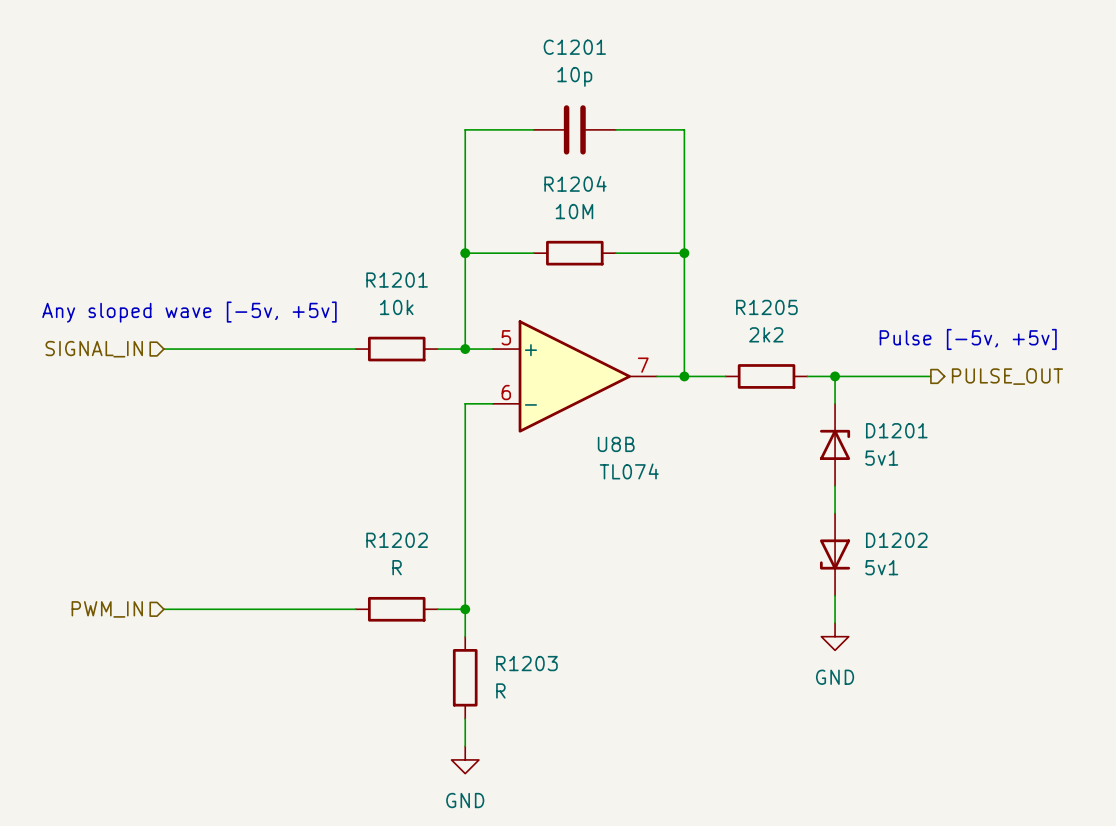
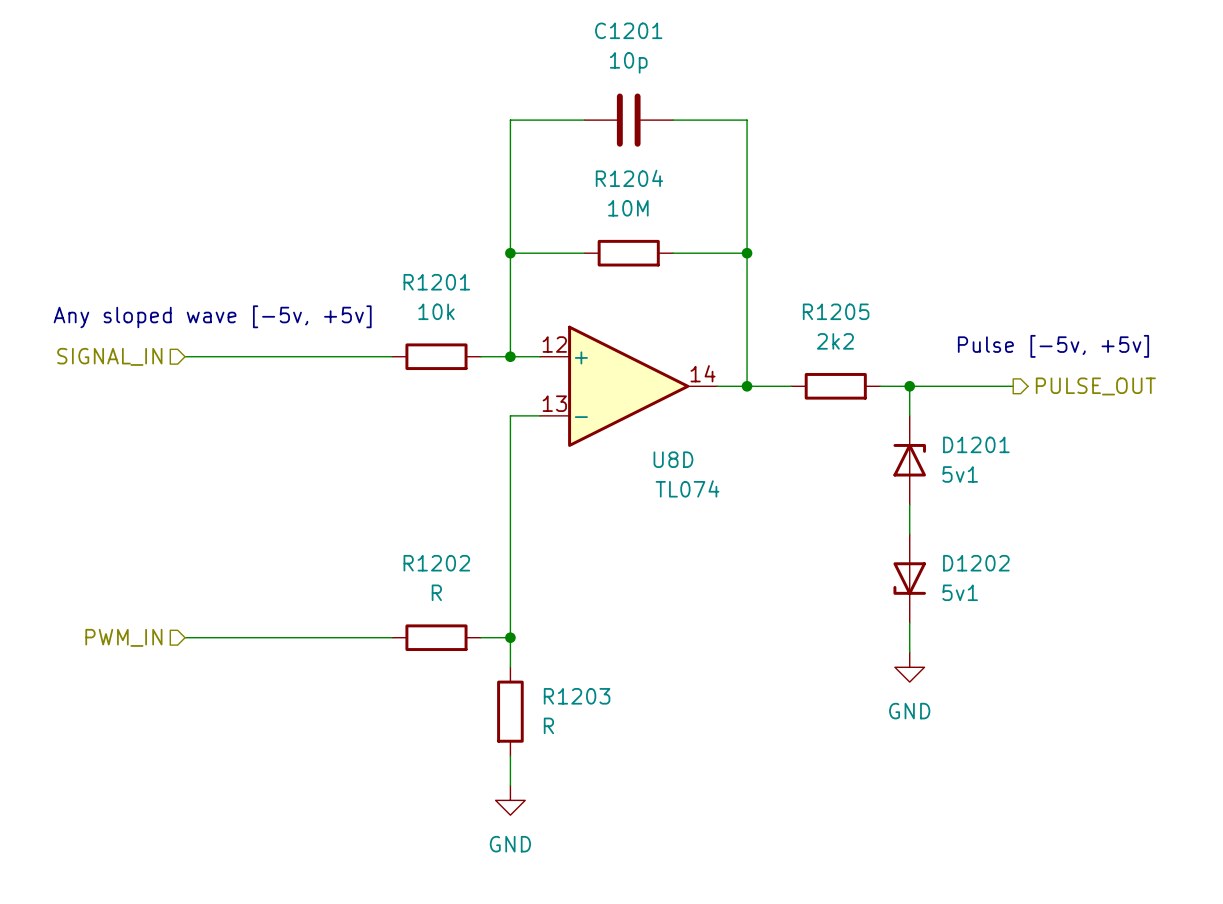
U8B pin number: 5 (506, 337) -> 12 (554, 344)
U8B pin number: 7 (643, 365) -> 14 (703, 373)
U8B pin number: 6 (506, 392) -> 13 (554, 403)
U8B name: U8B (616, 444) -> U8D (673, 459)

